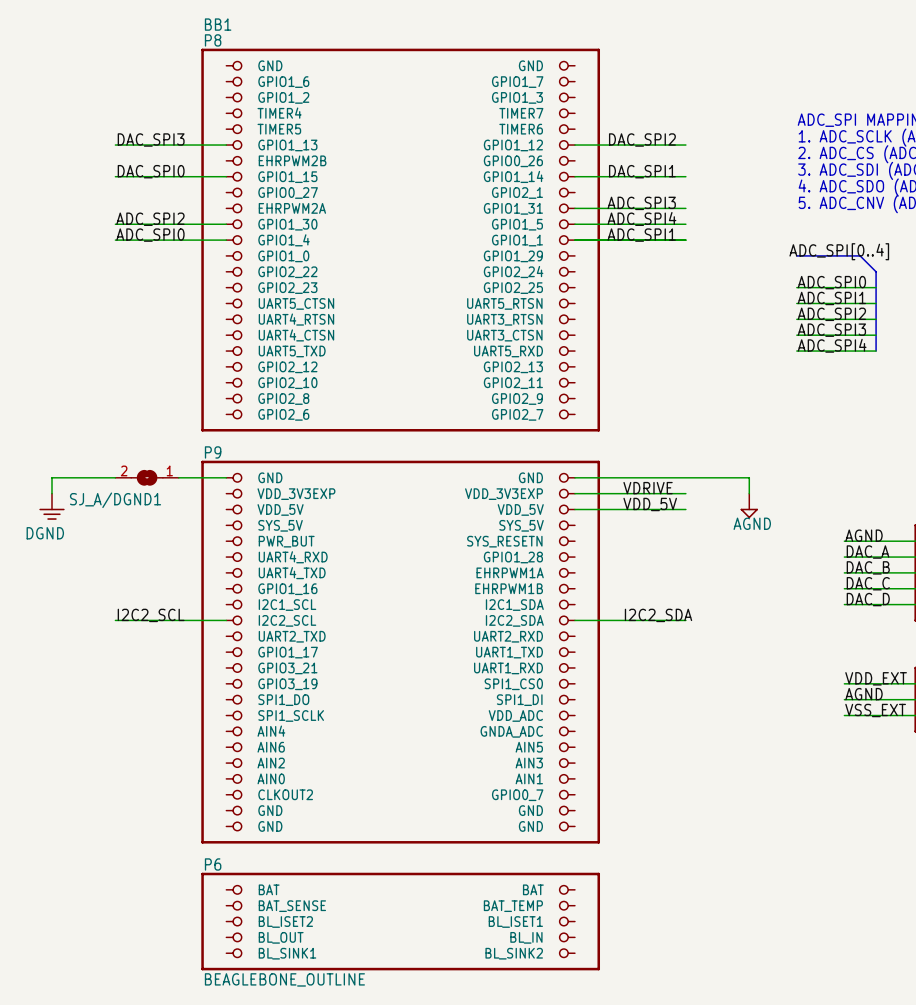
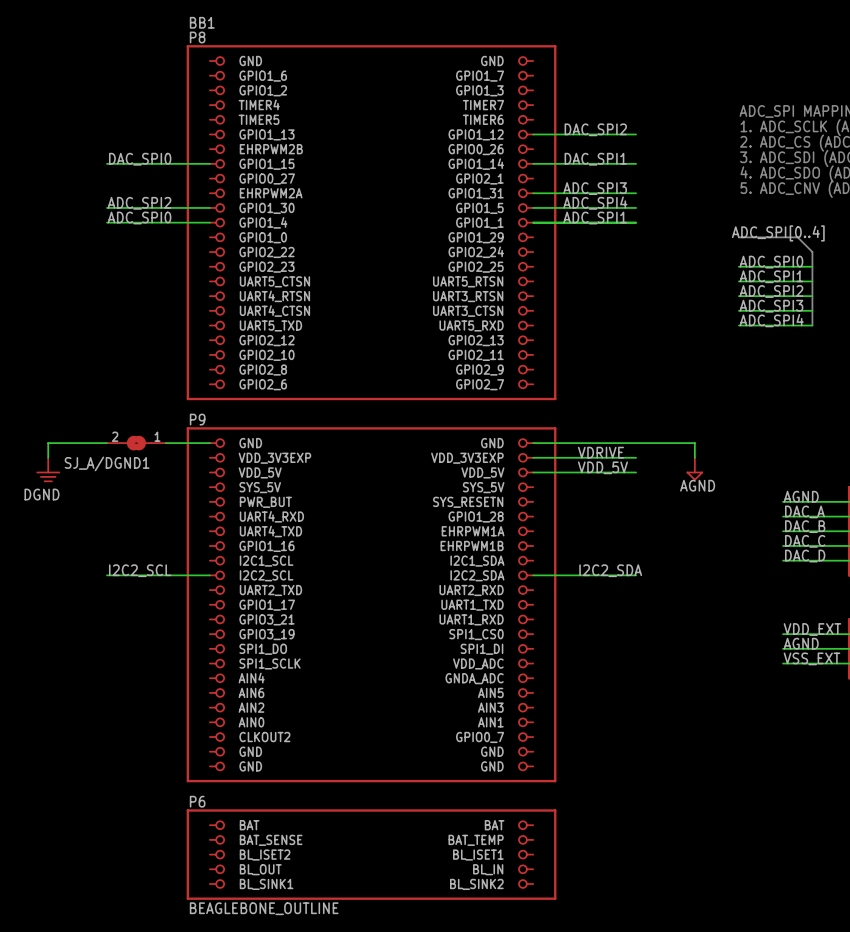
label: DAC_SPI3 (151, 139) -> none
wire: (115, 145) (226, 145) -> none

